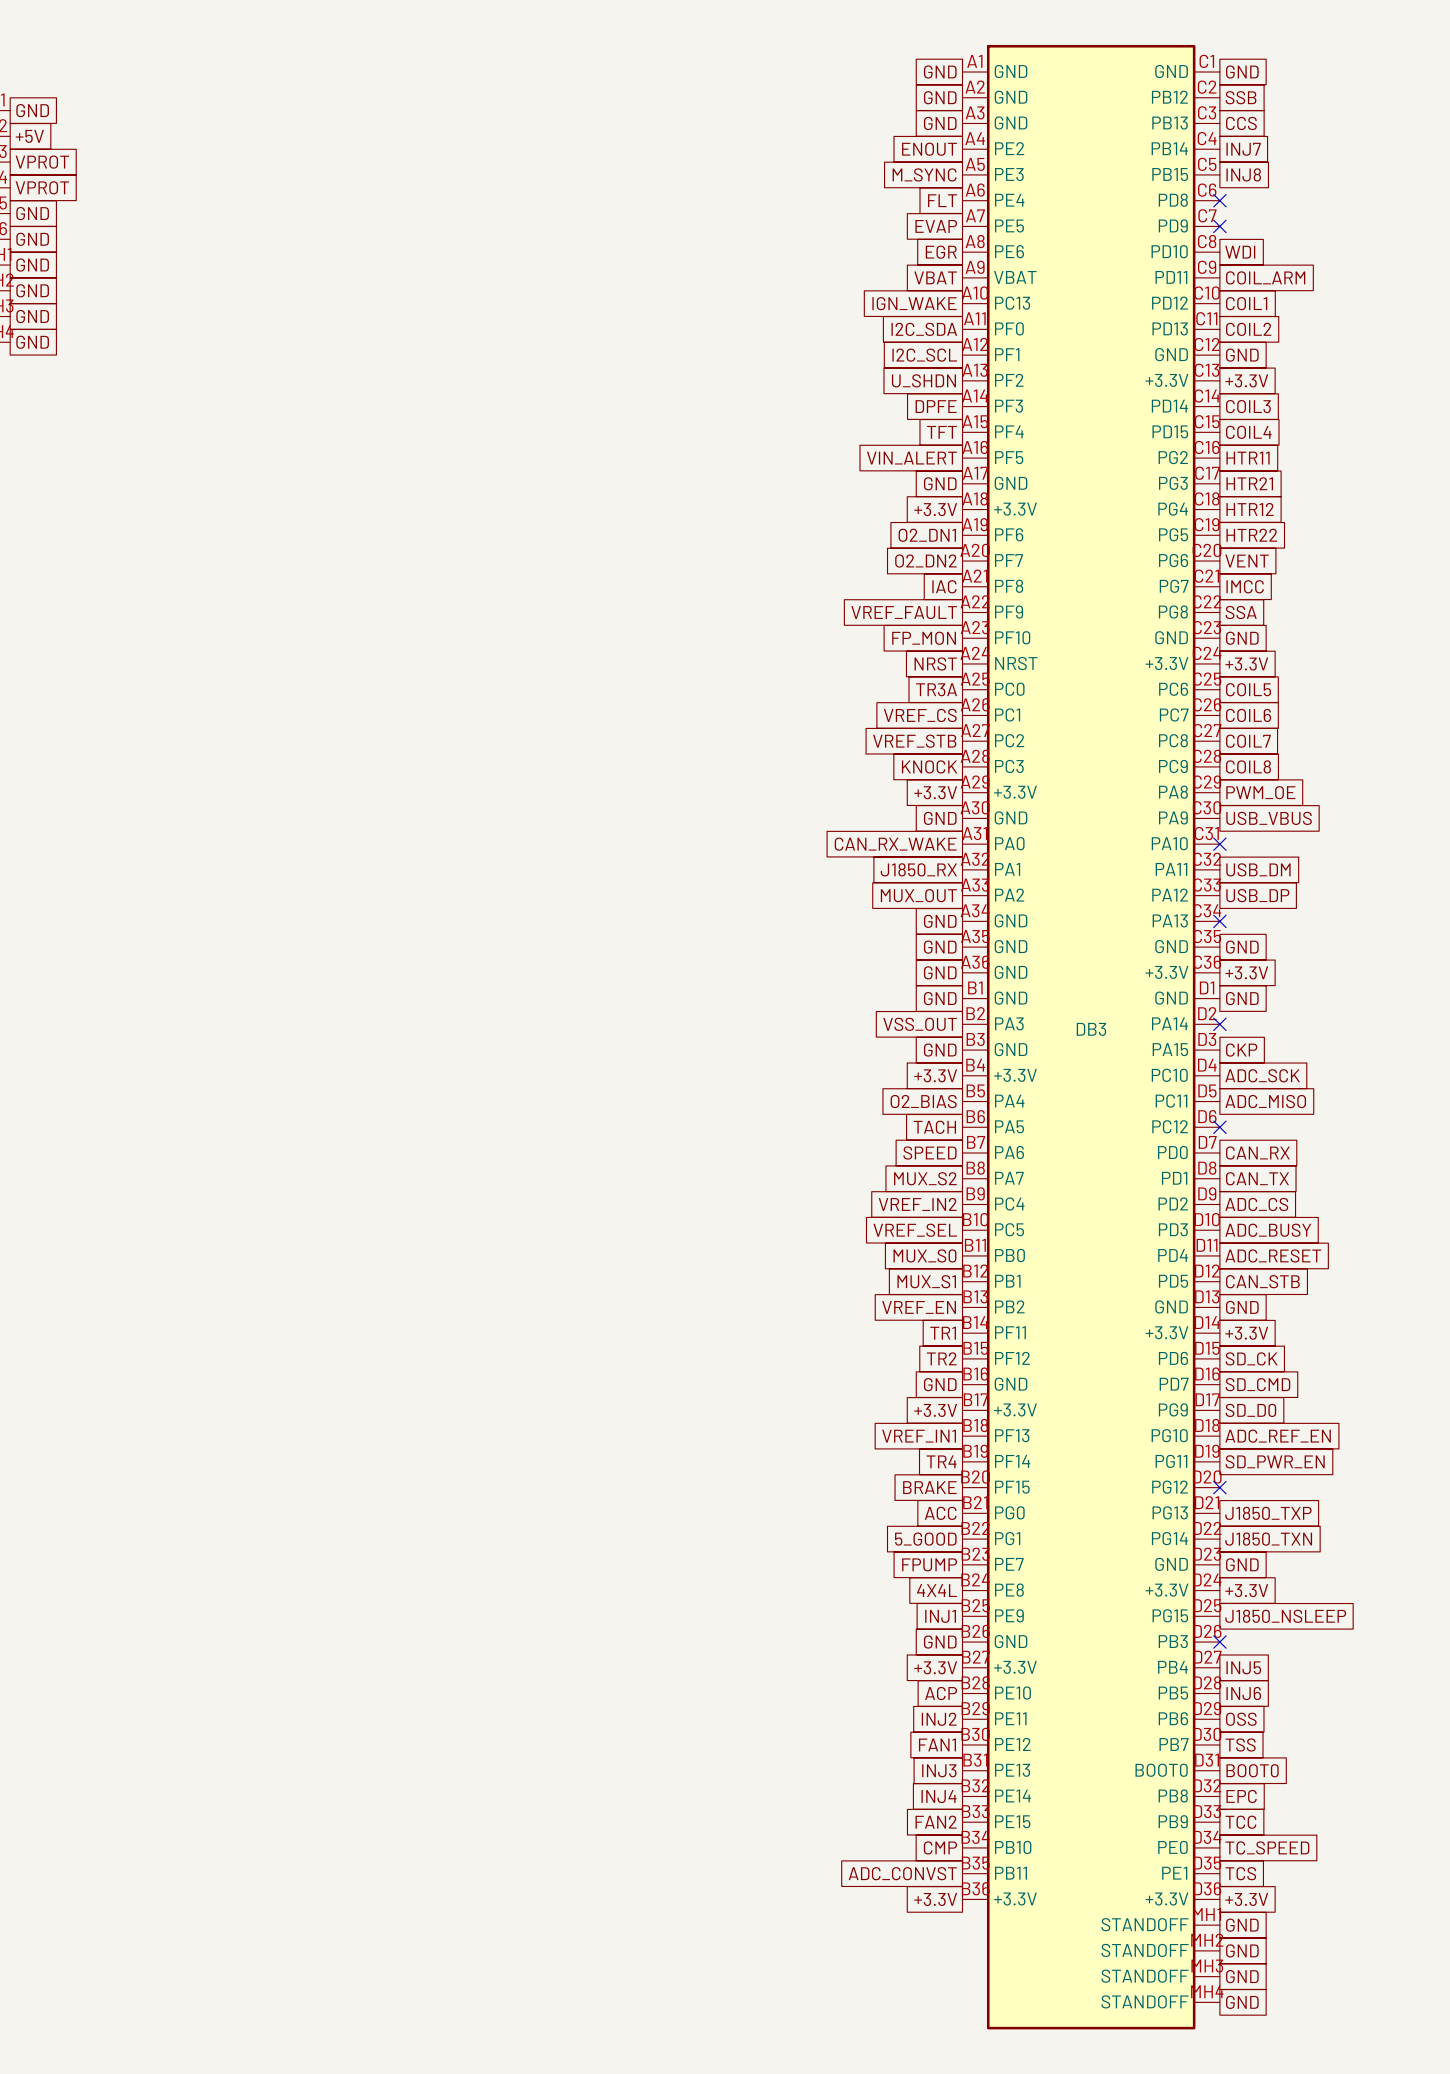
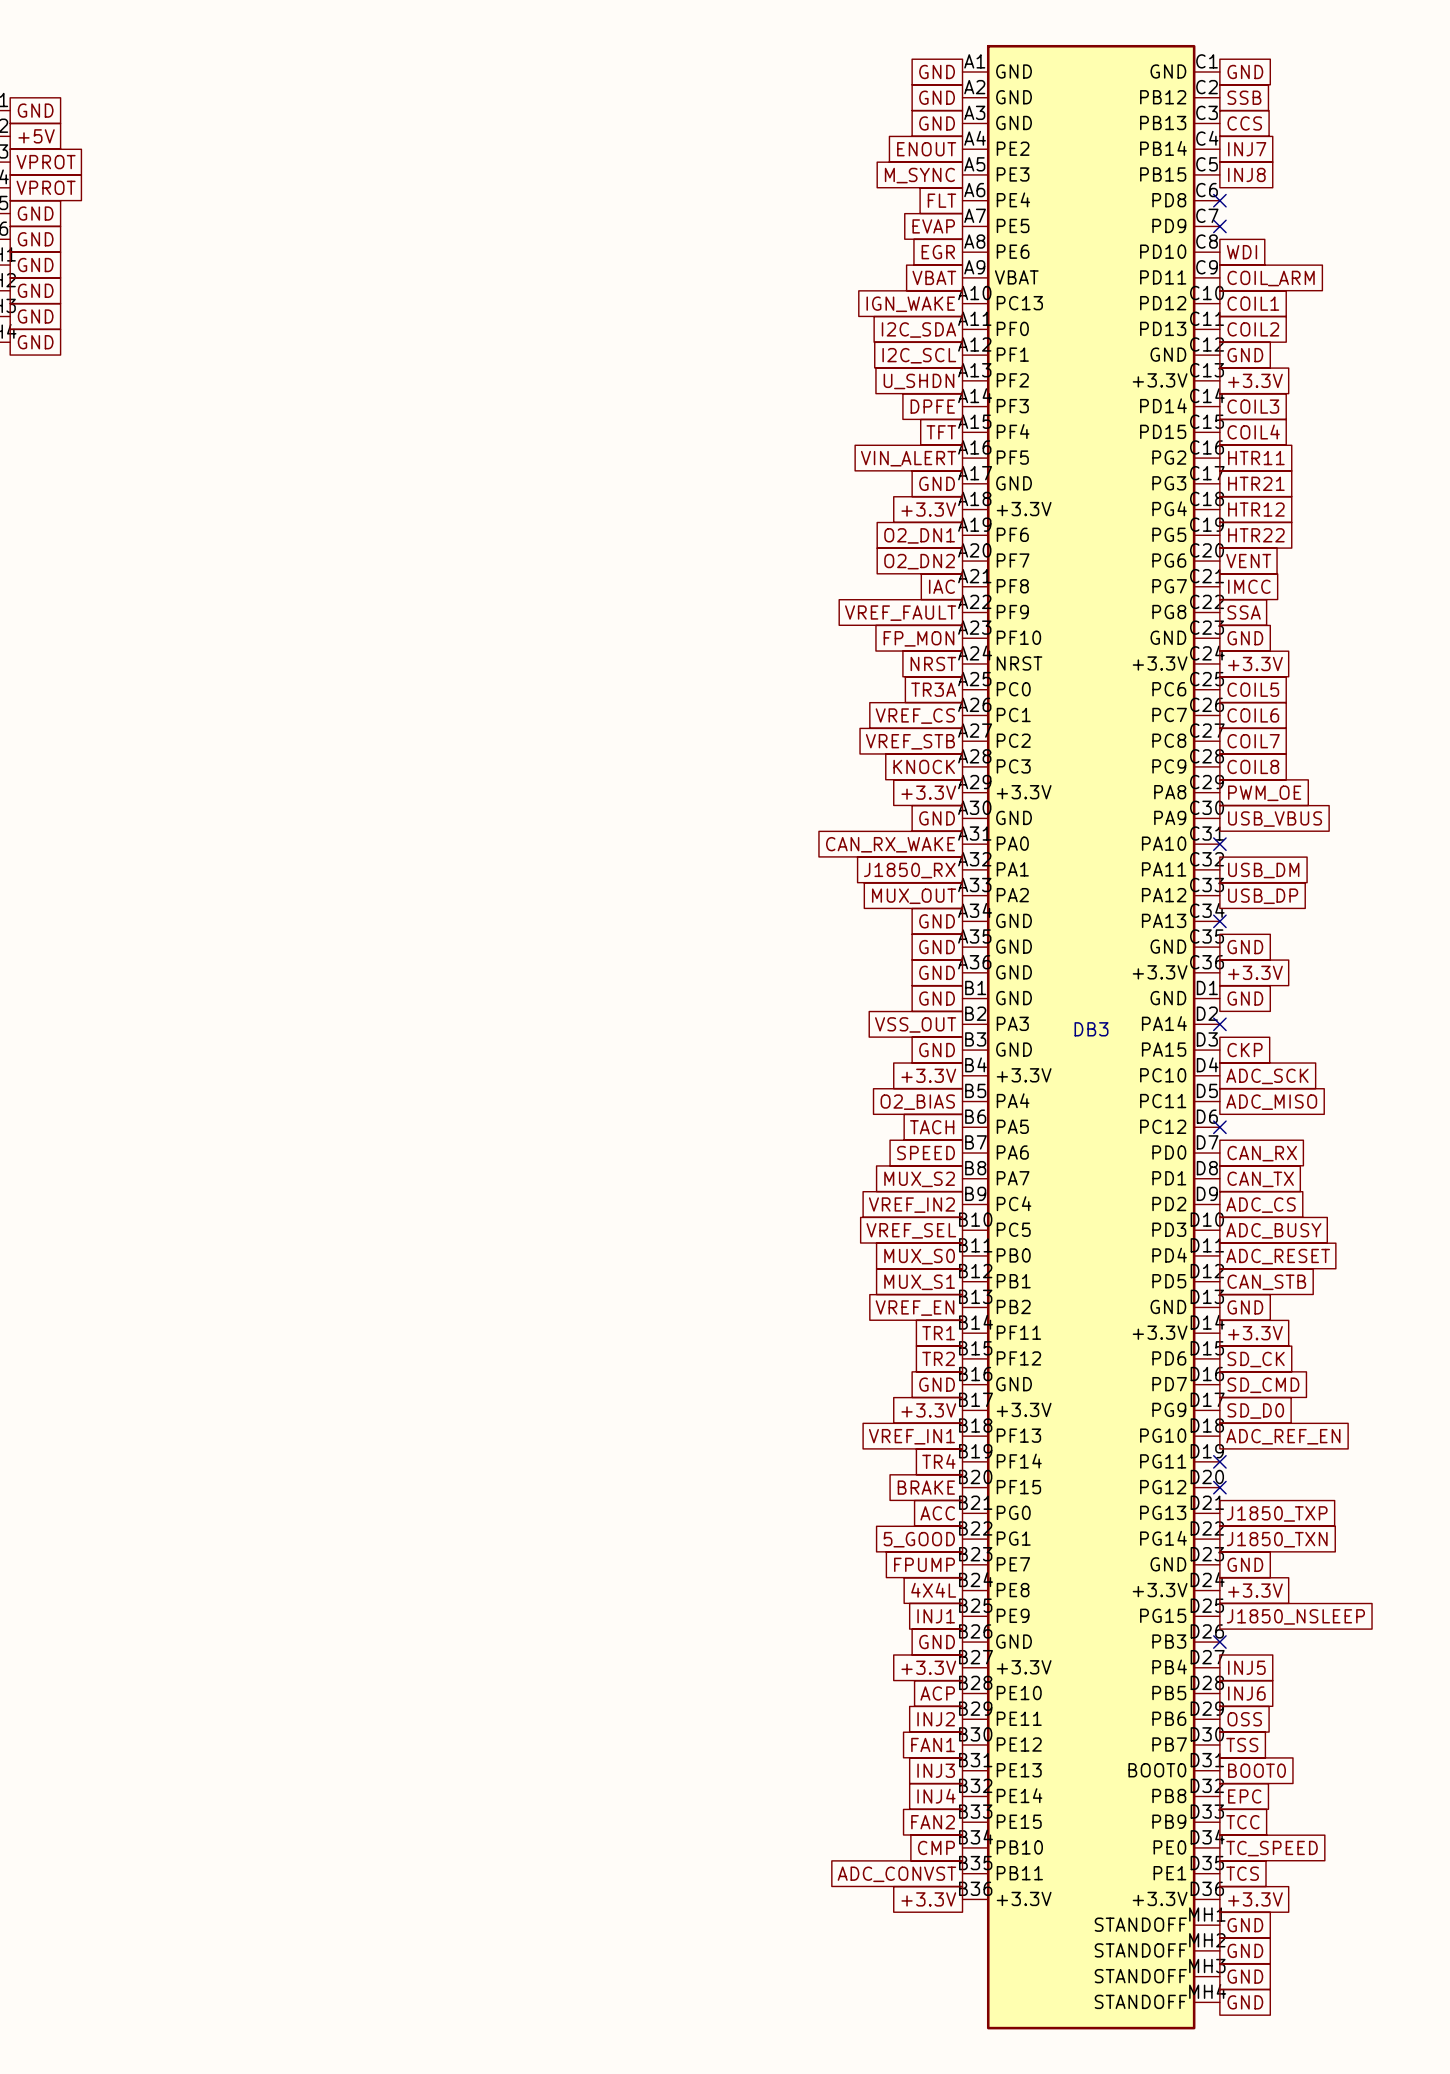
no-connect mark: none -> (1219, 1461)
global label: SD_PWR_EN (1275, 1461) -> none

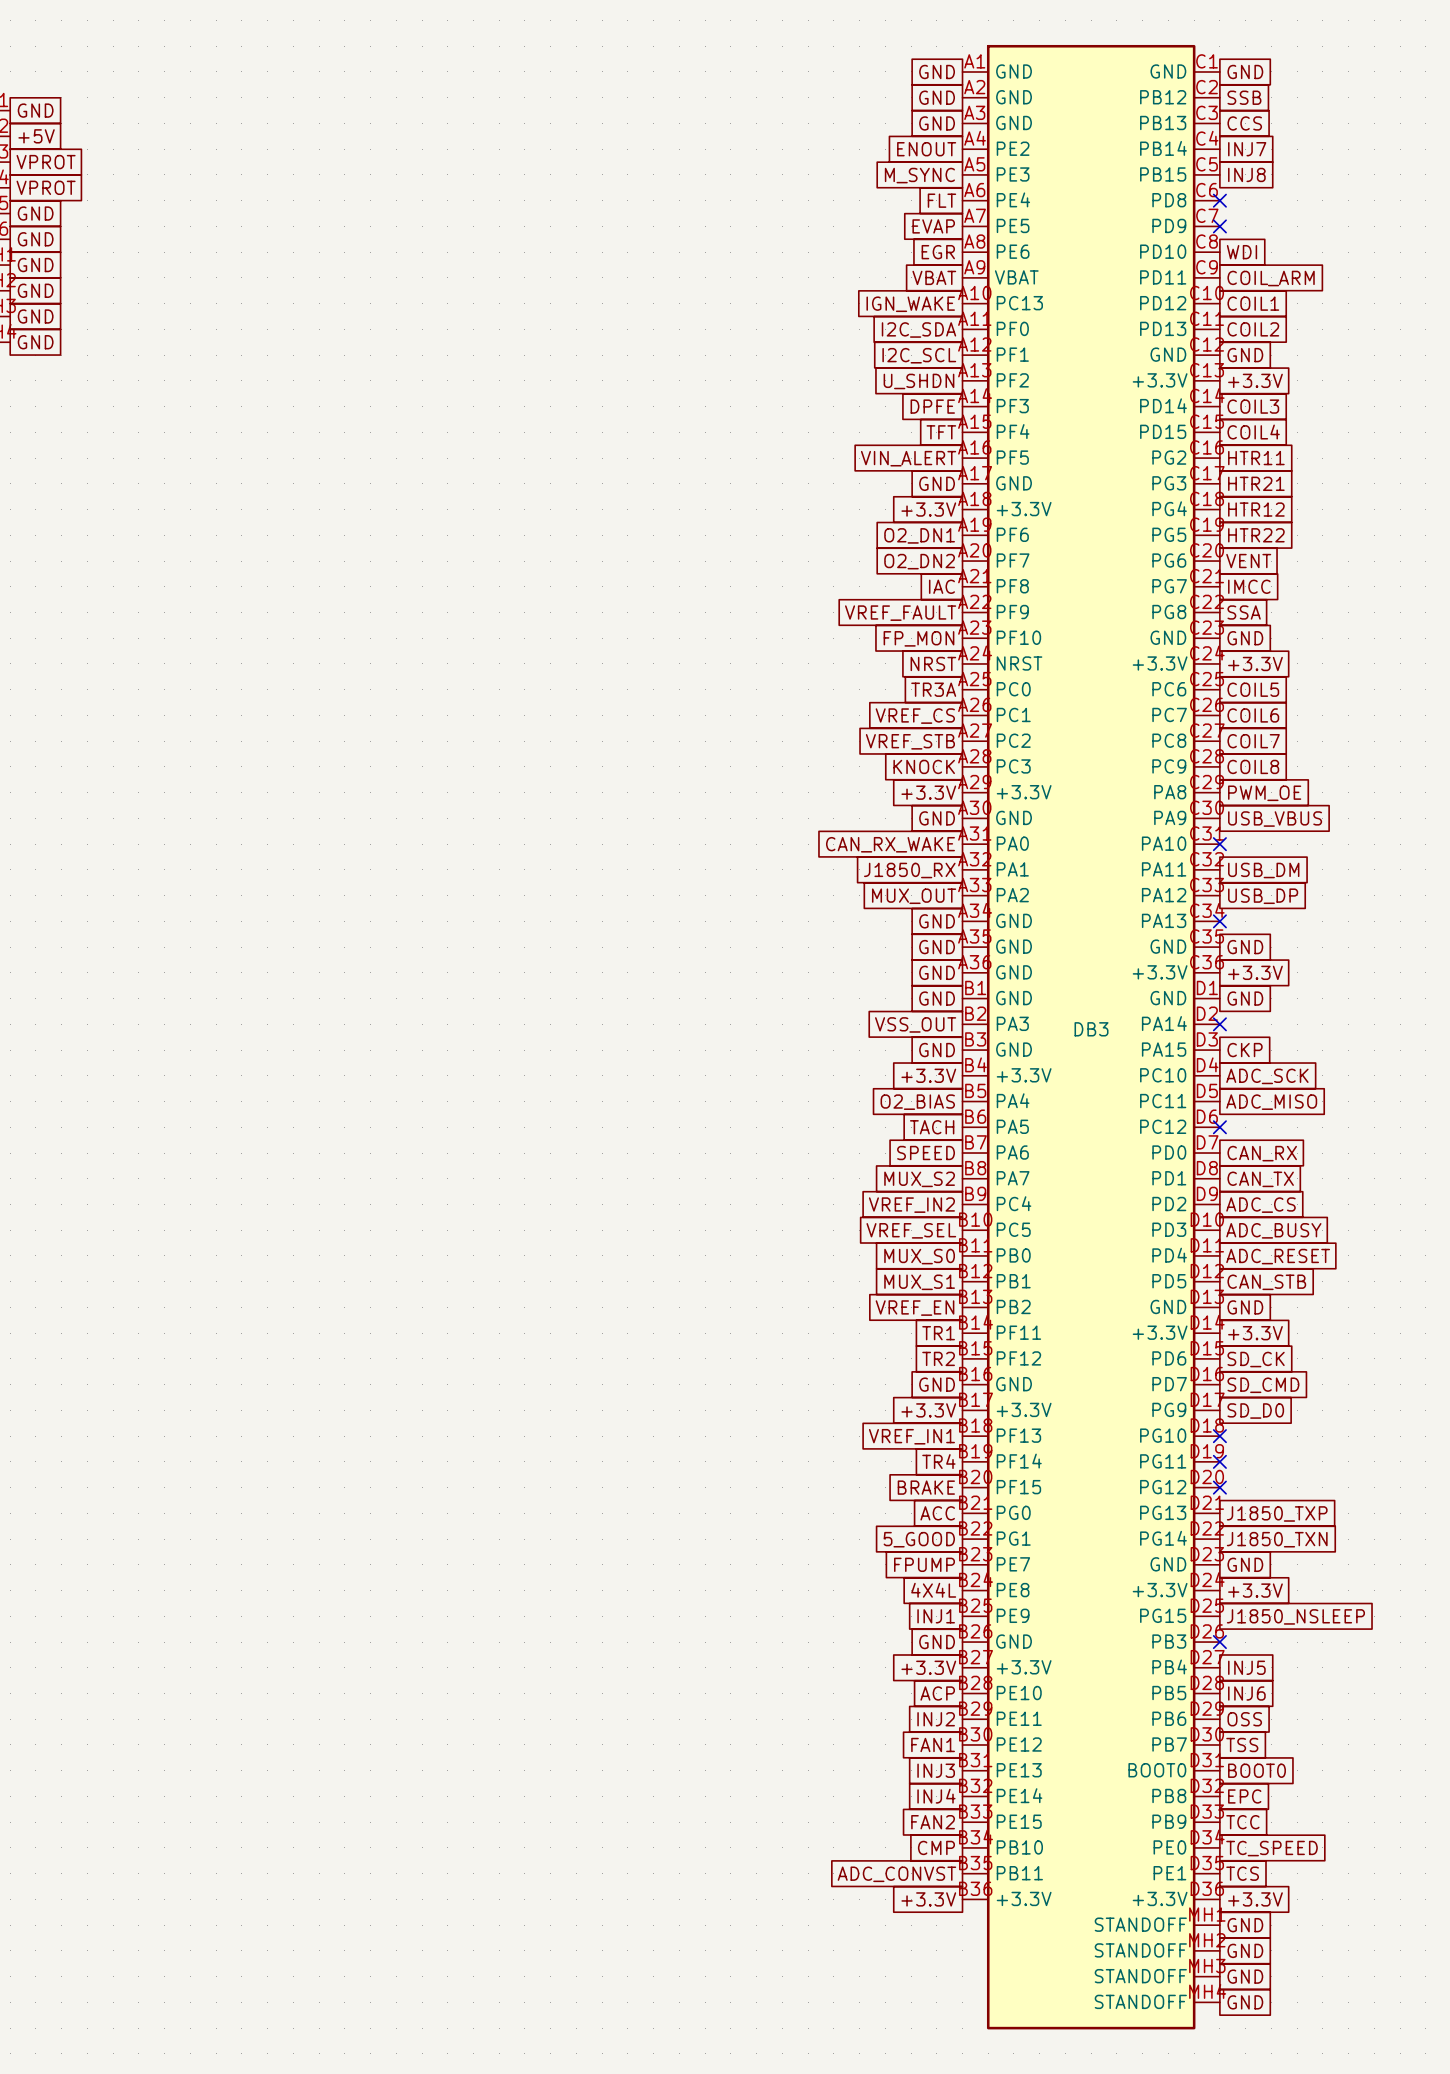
no-connect mark: none -> (1219, 1436)
global label: ADC_REF_EN (1283, 1436) -> none

